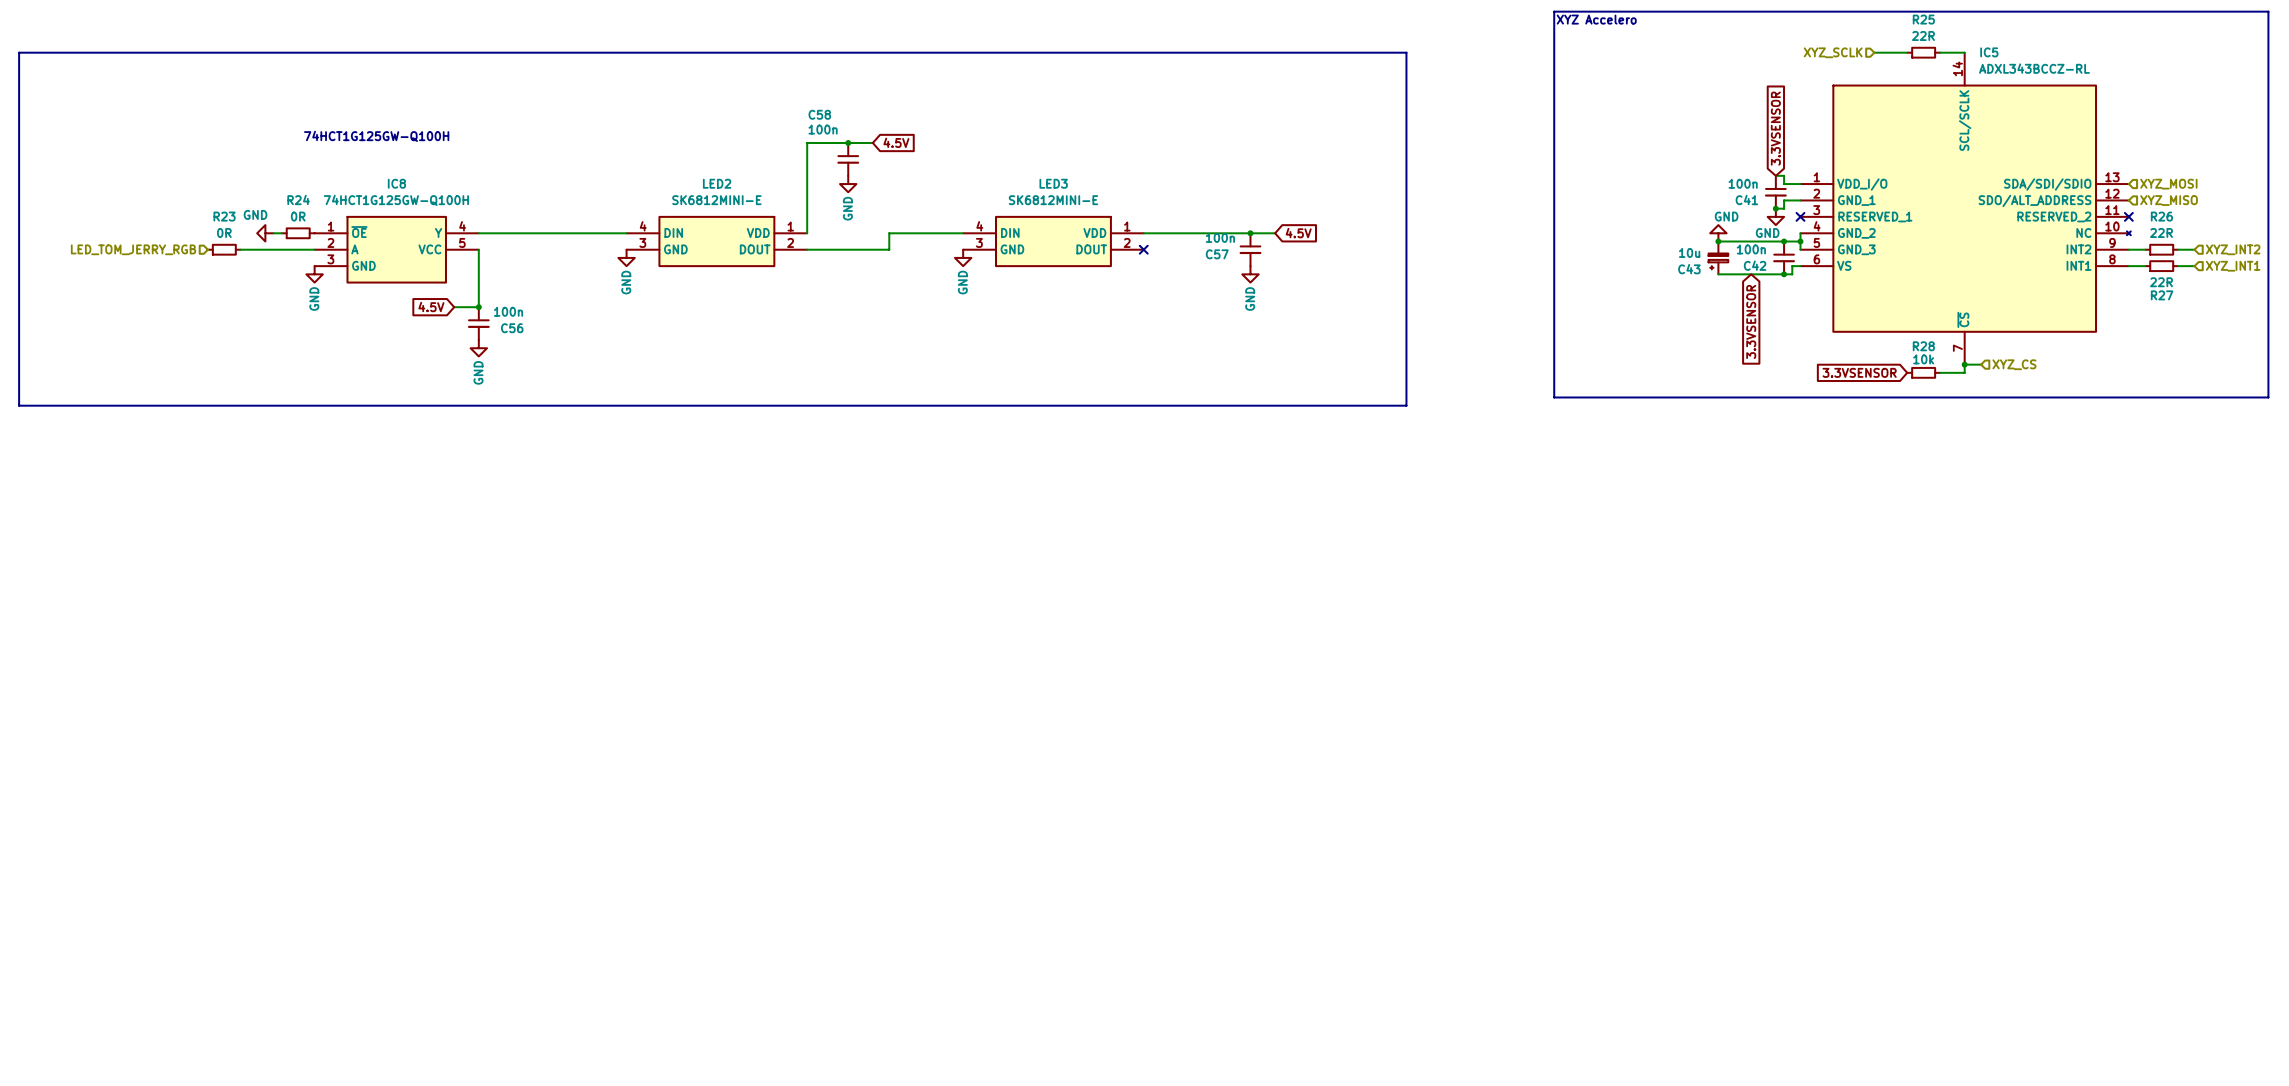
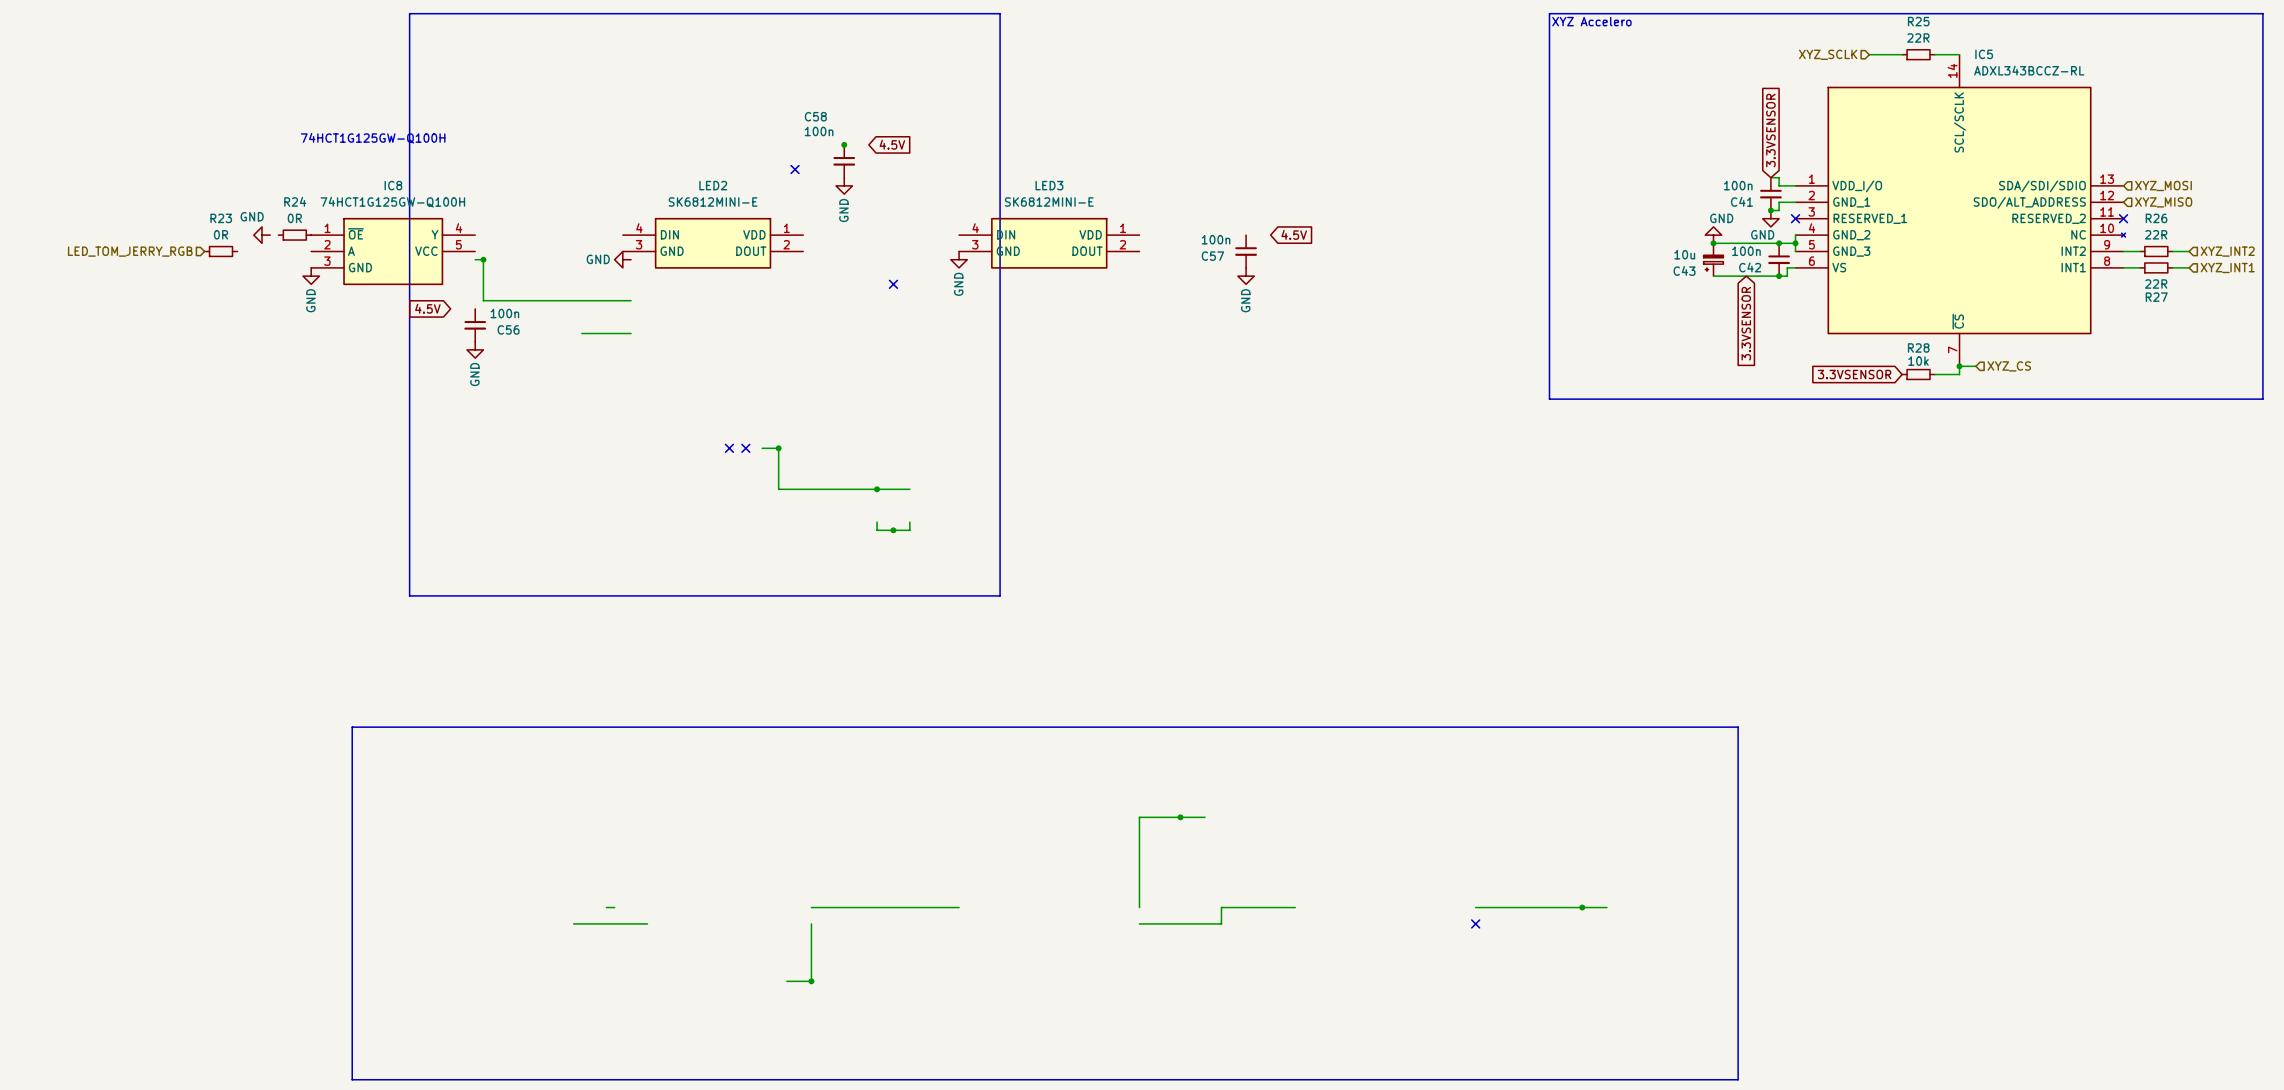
line: none -> (409, 13) (1000, 13) (1000, 595) (409, 595) (409, 13)
line: (19, 52) (1406, 52) (1406, 405) (19, 405) (19, 52) -> none
wire: (872, 143) (807, 143) (807, 233) -> none
no-connect mark: none -> (795, 169)
wire: (273, 233) (281, 233) -> none
wire: (478, 233) (626, 233) -> none
wire: (963, 233) (889, 233) (889, 249) (807, 249) -> none
wire: (1143, 233) (1275, 233) -> none
junction: (1250, 233) -> none
wire: (240, 249) (314, 249) -> none
wire: (478, 249) (478, 307) (454, 307) -> none
no-connect mark: (1143, 249) -> none
wire: none -> (475, 259) (483, 259) (483, 300) (631, 300)
junction: none -> (483, 259)
power symbol rotation: 0° (626, 257) -> 90° clockwise (622, 259)
no-connect mark: none -> (893, 284)
junction: (478, 307) -> none
wire: none -> (581, 333) (631, 333)
no-connect mark: none -> (729, 448)
no-connect mark: none -> (745, 448)
wire: none -> (762, 448) (778, 448) (778, 489) (909, 489)
junction: none -> (778, 448)
junction: none -> (877, 489)
wire: none -> (877, 522) (877, 530) (909, 530) (909, 522)
junction: none -> (893, 530)
line: none -> (352, 727) (1738, 727) (1738, 1079) (352, 1079) (352, 727)
junction: none -> (1180, 817)
wire: none -> (1205, 817) (1139, 817) (1139, 907)
wire: none -> (606, 907) (614, 907)
wire: none -> (811, 907) (959, 907)
wire: none -> (1295, 907) (1221, 907) (1221, 923) (1139, 923)
wire: none -> (1475, 907) (1606, 907)
junction: none -> (1582, 907)
wire: none -> (573, 923) (647, 923)
wire: none -> (811, 923) (811, 981) (786, 981)
no-connect mark: none -> (1475, 923)
junction: none -> (811, 981)

